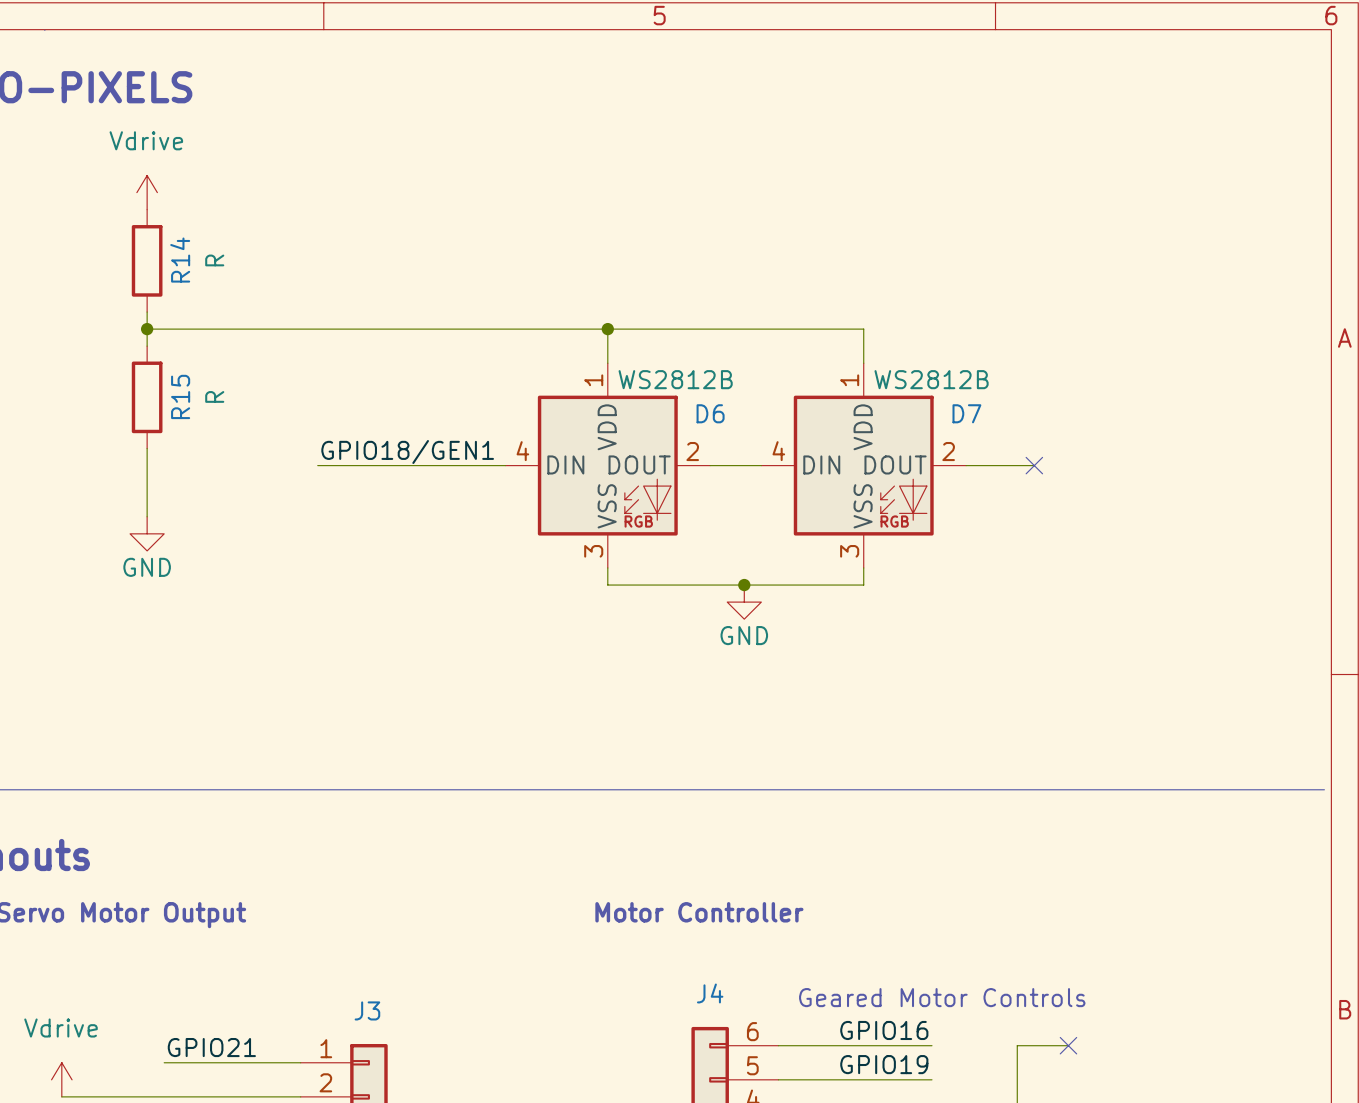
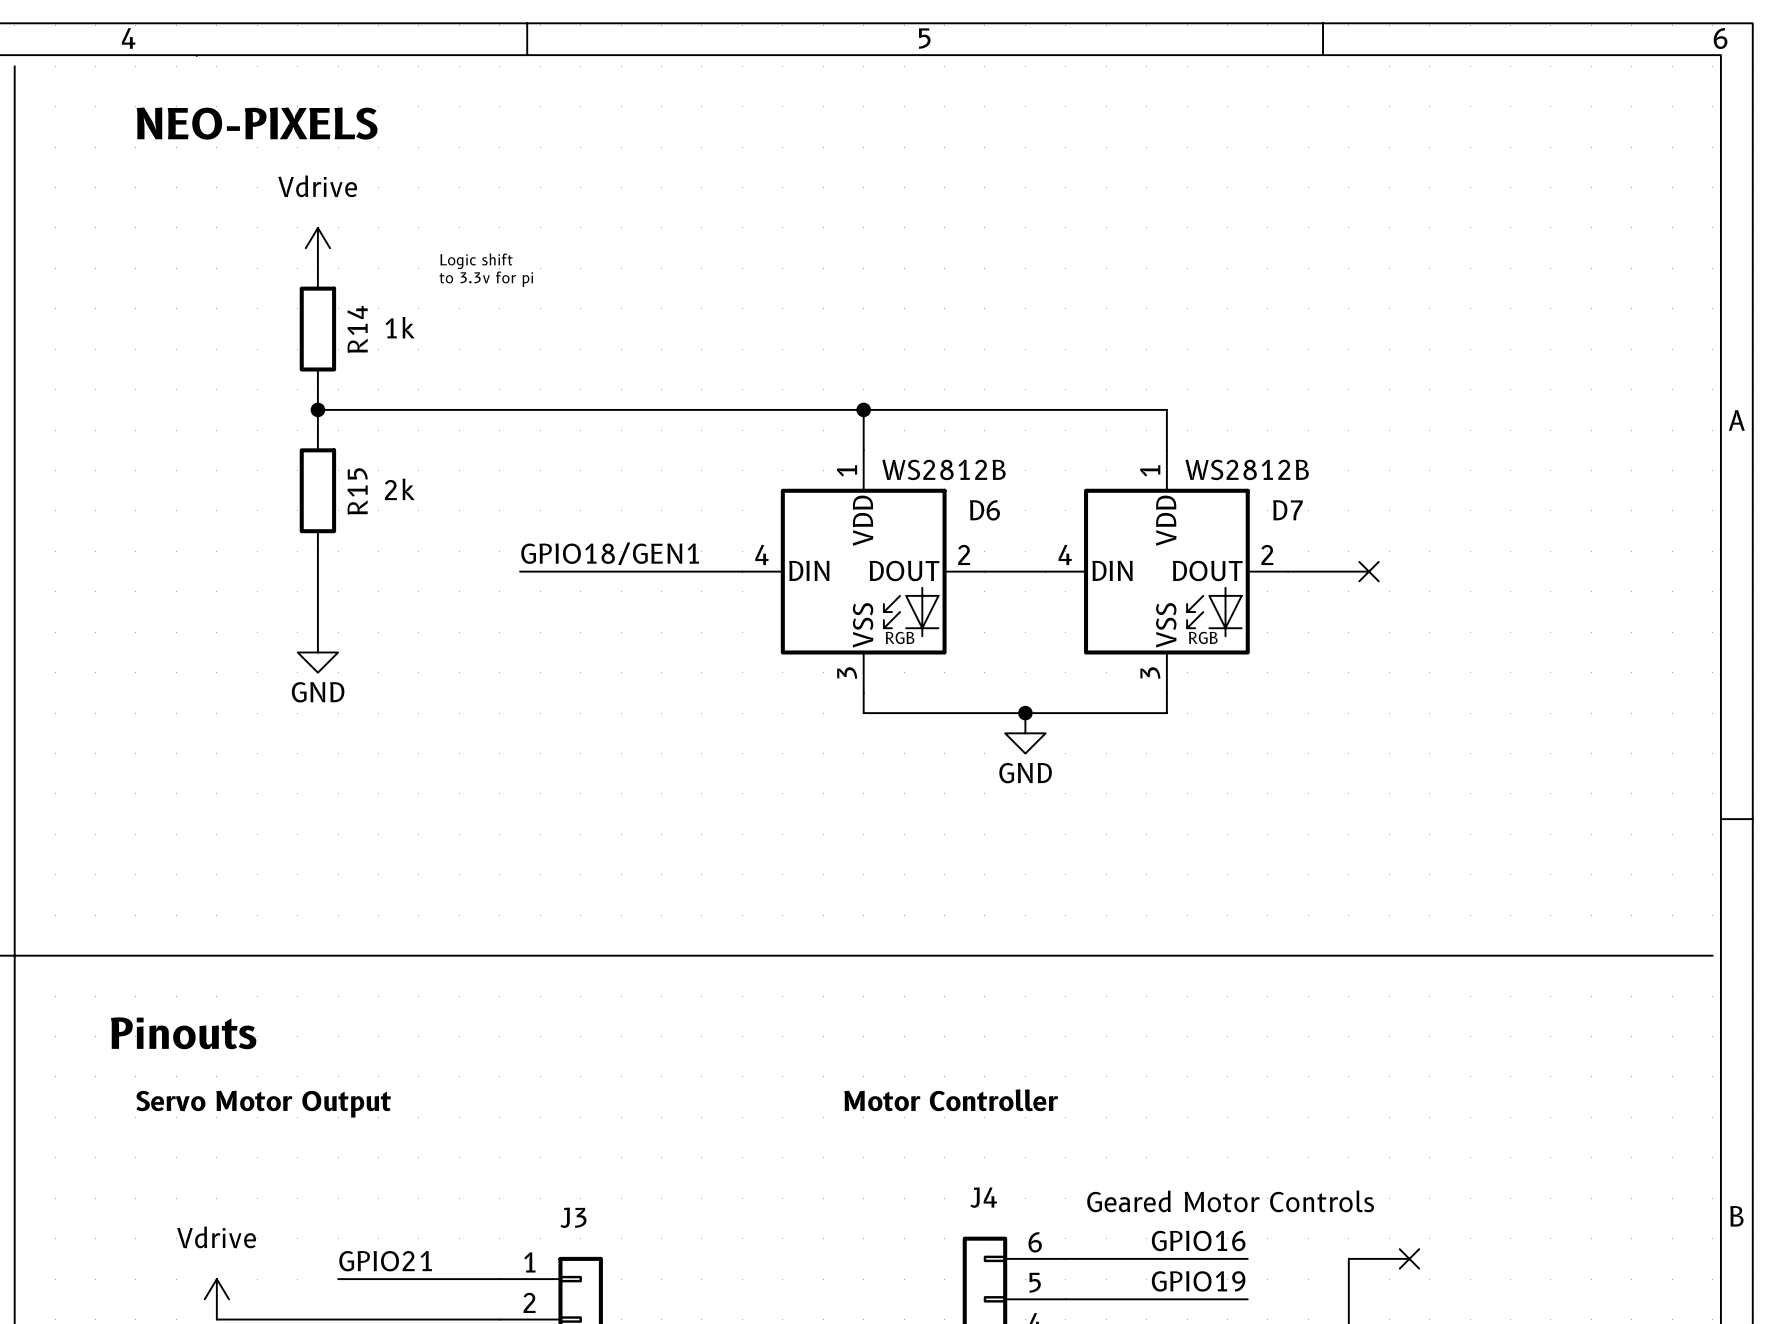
text: none -> Logic shift (476, 261)
text: none -> to 3.3v for pi (486, 279)
R14 value: R (214, 260) -> 1k (400, 327)
R15 value: R (214, 396) -> 2k (399, 489)

